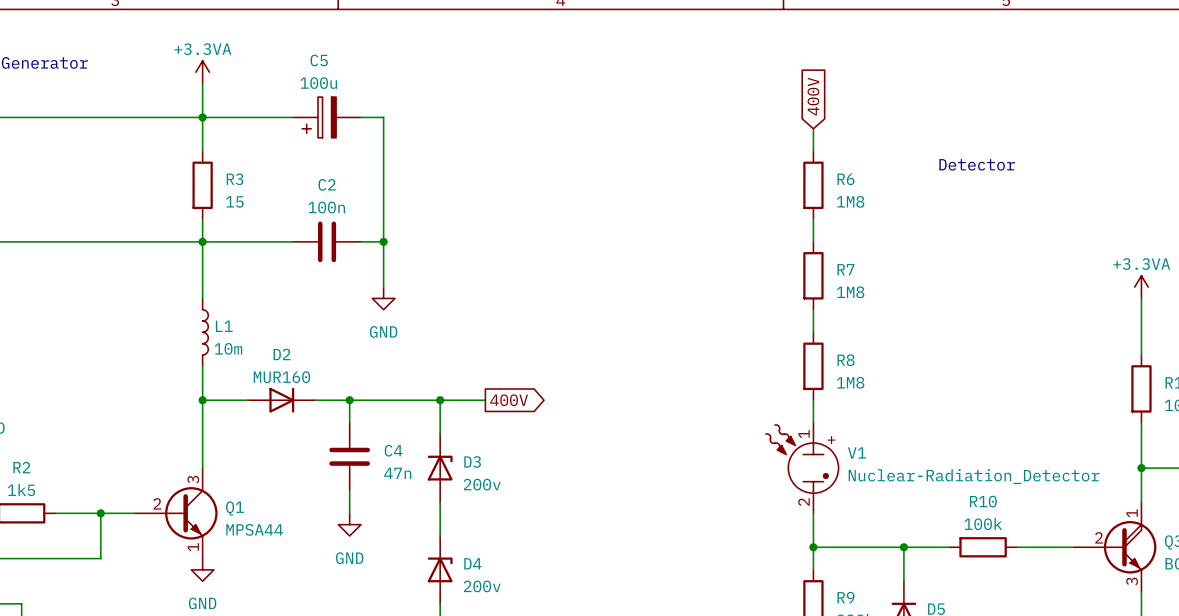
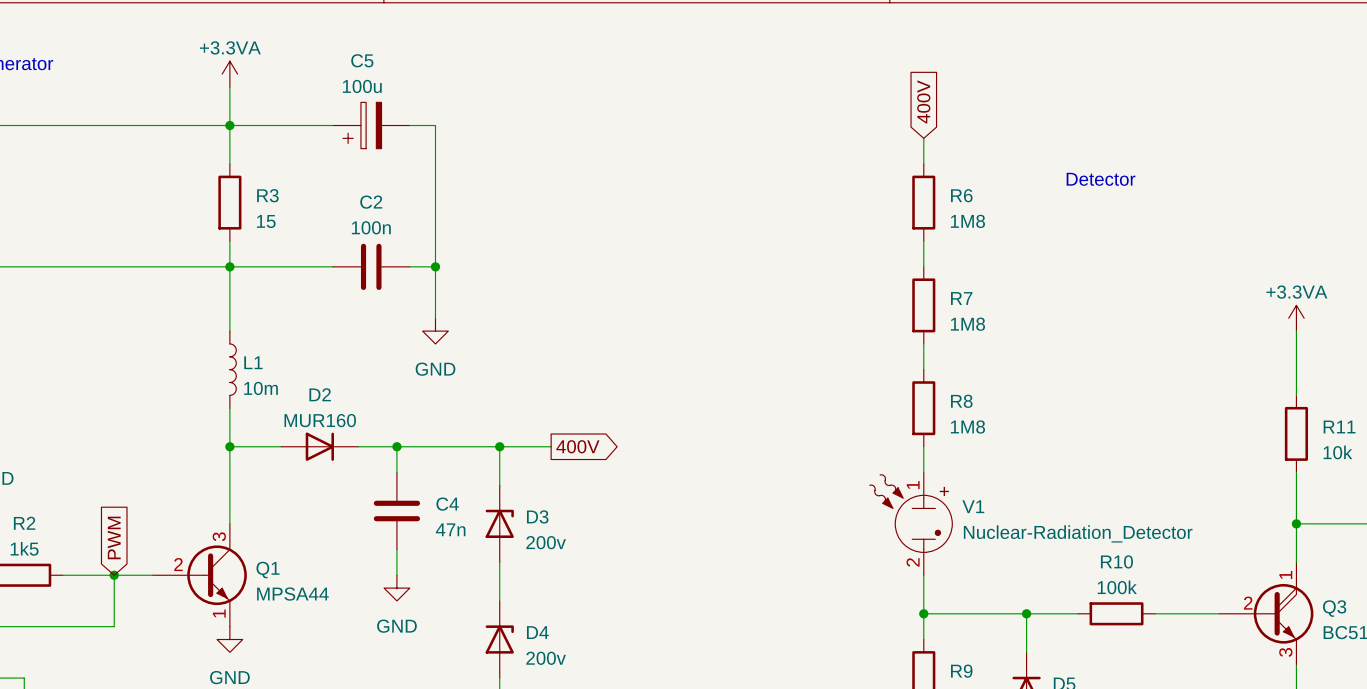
global label: none -> PWM (114, 537)

